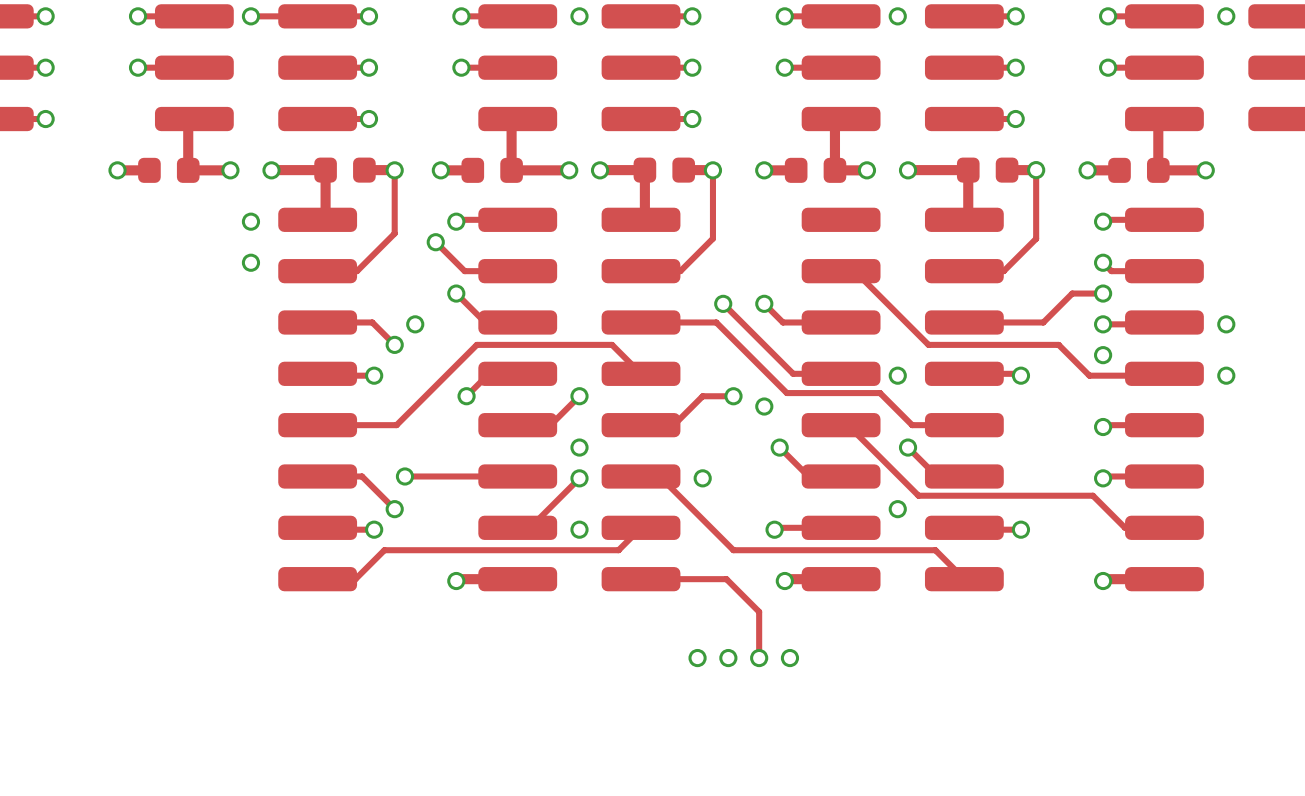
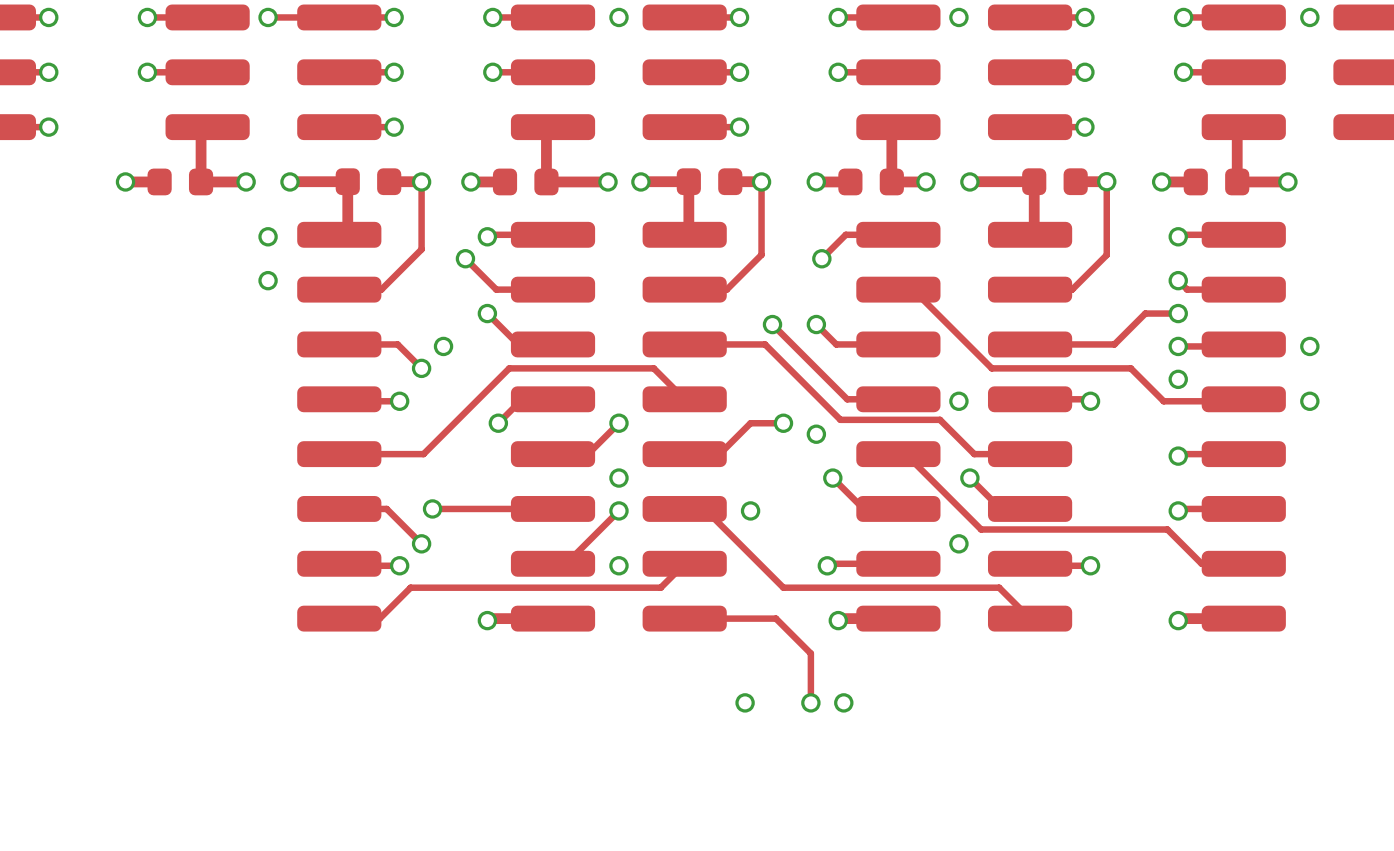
top track: none -> (898, 234) (845, 234) (821, 258)
via: none -> (821, 258)
via: (728, 658) -> none

